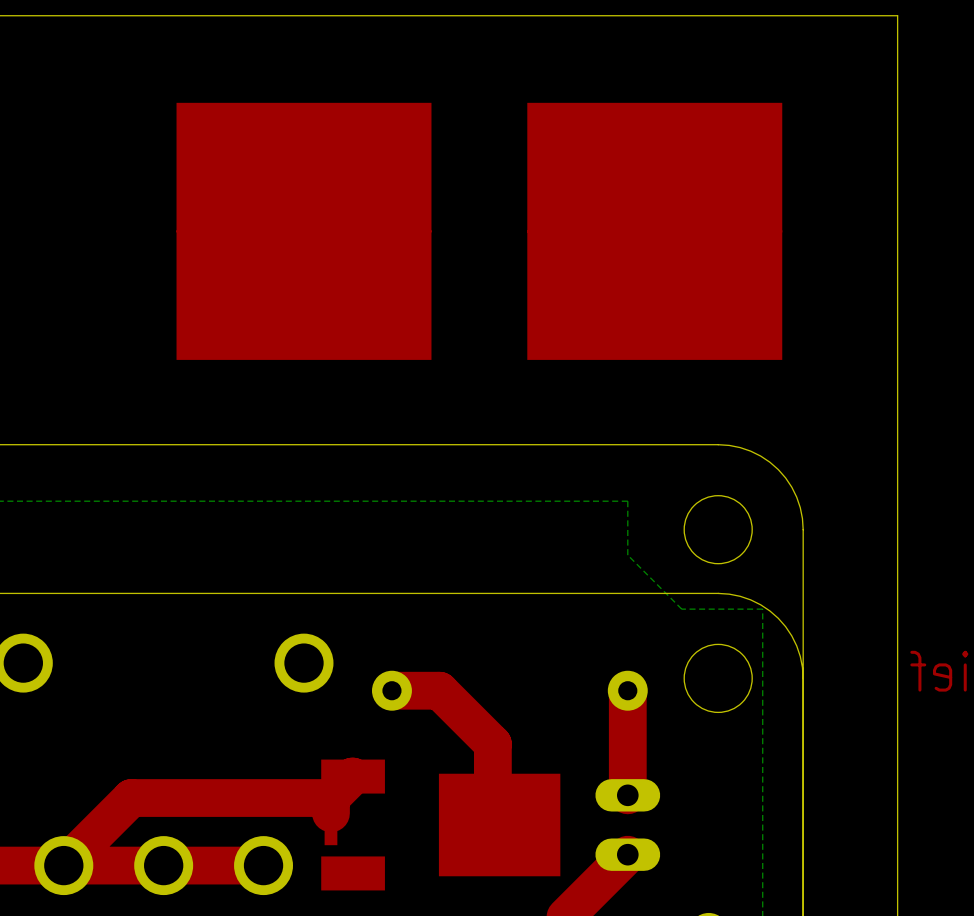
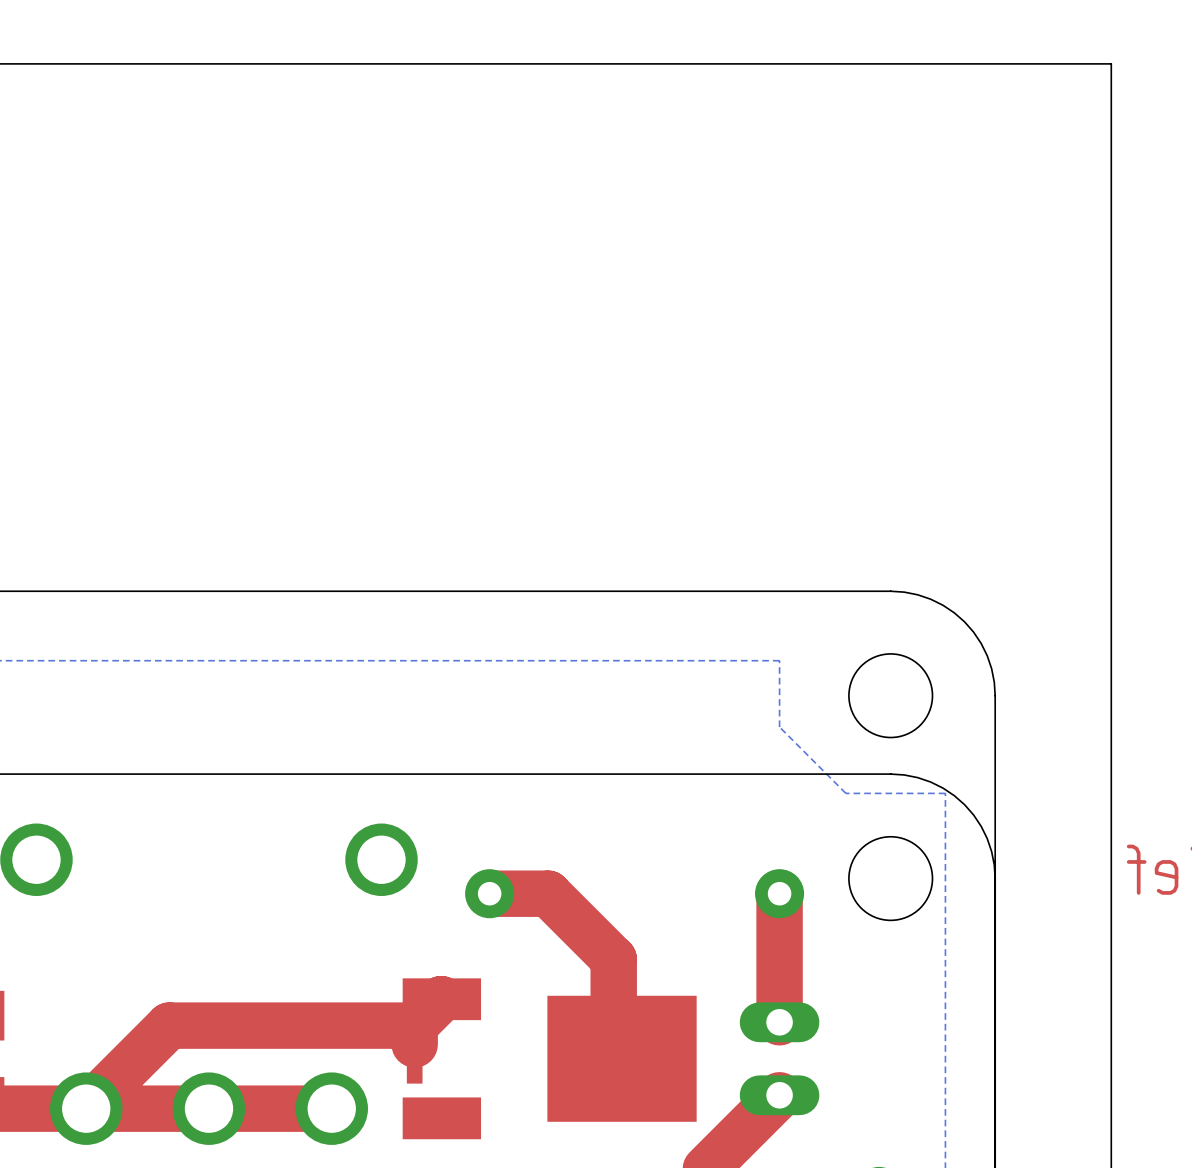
part: (304, 231) -> none
part: (654, 231) -> none

